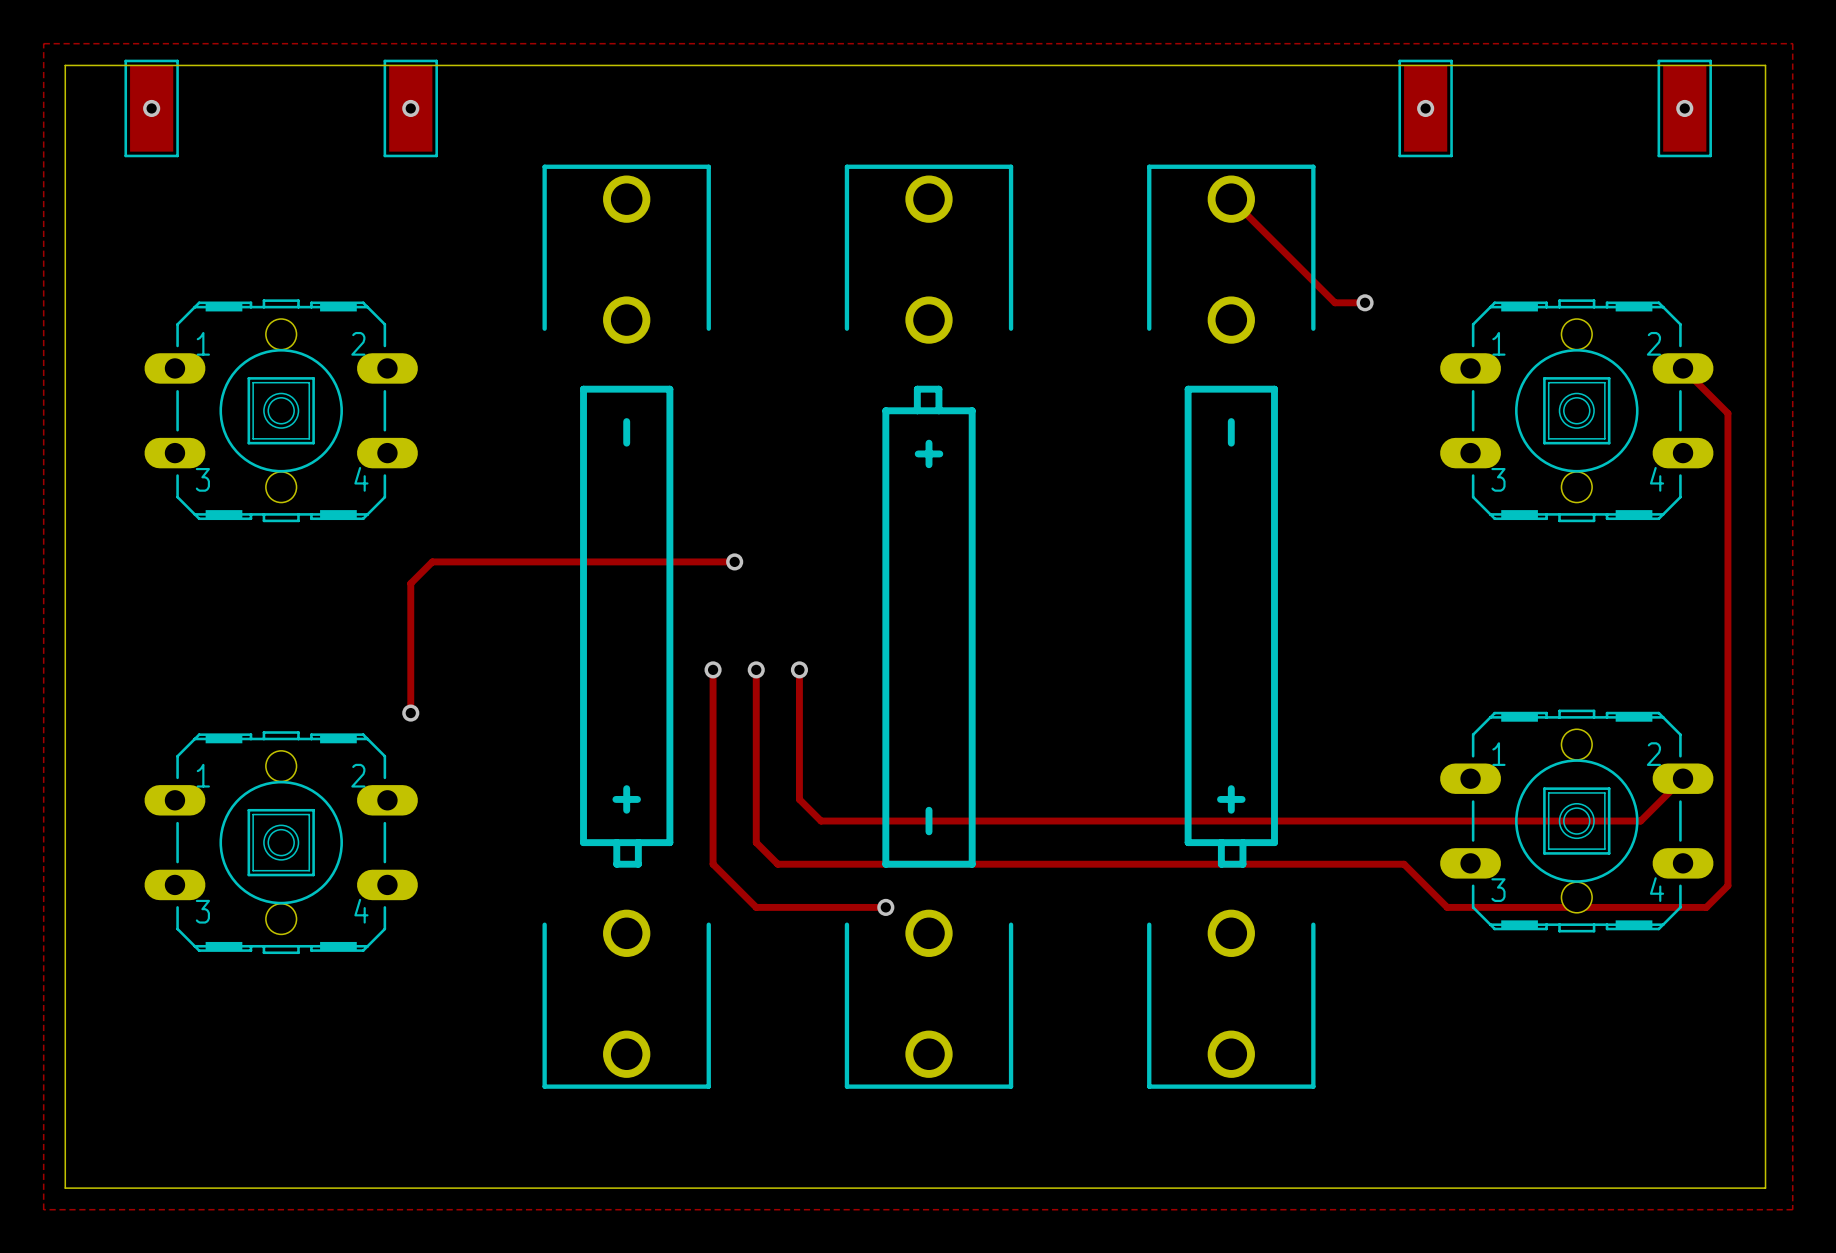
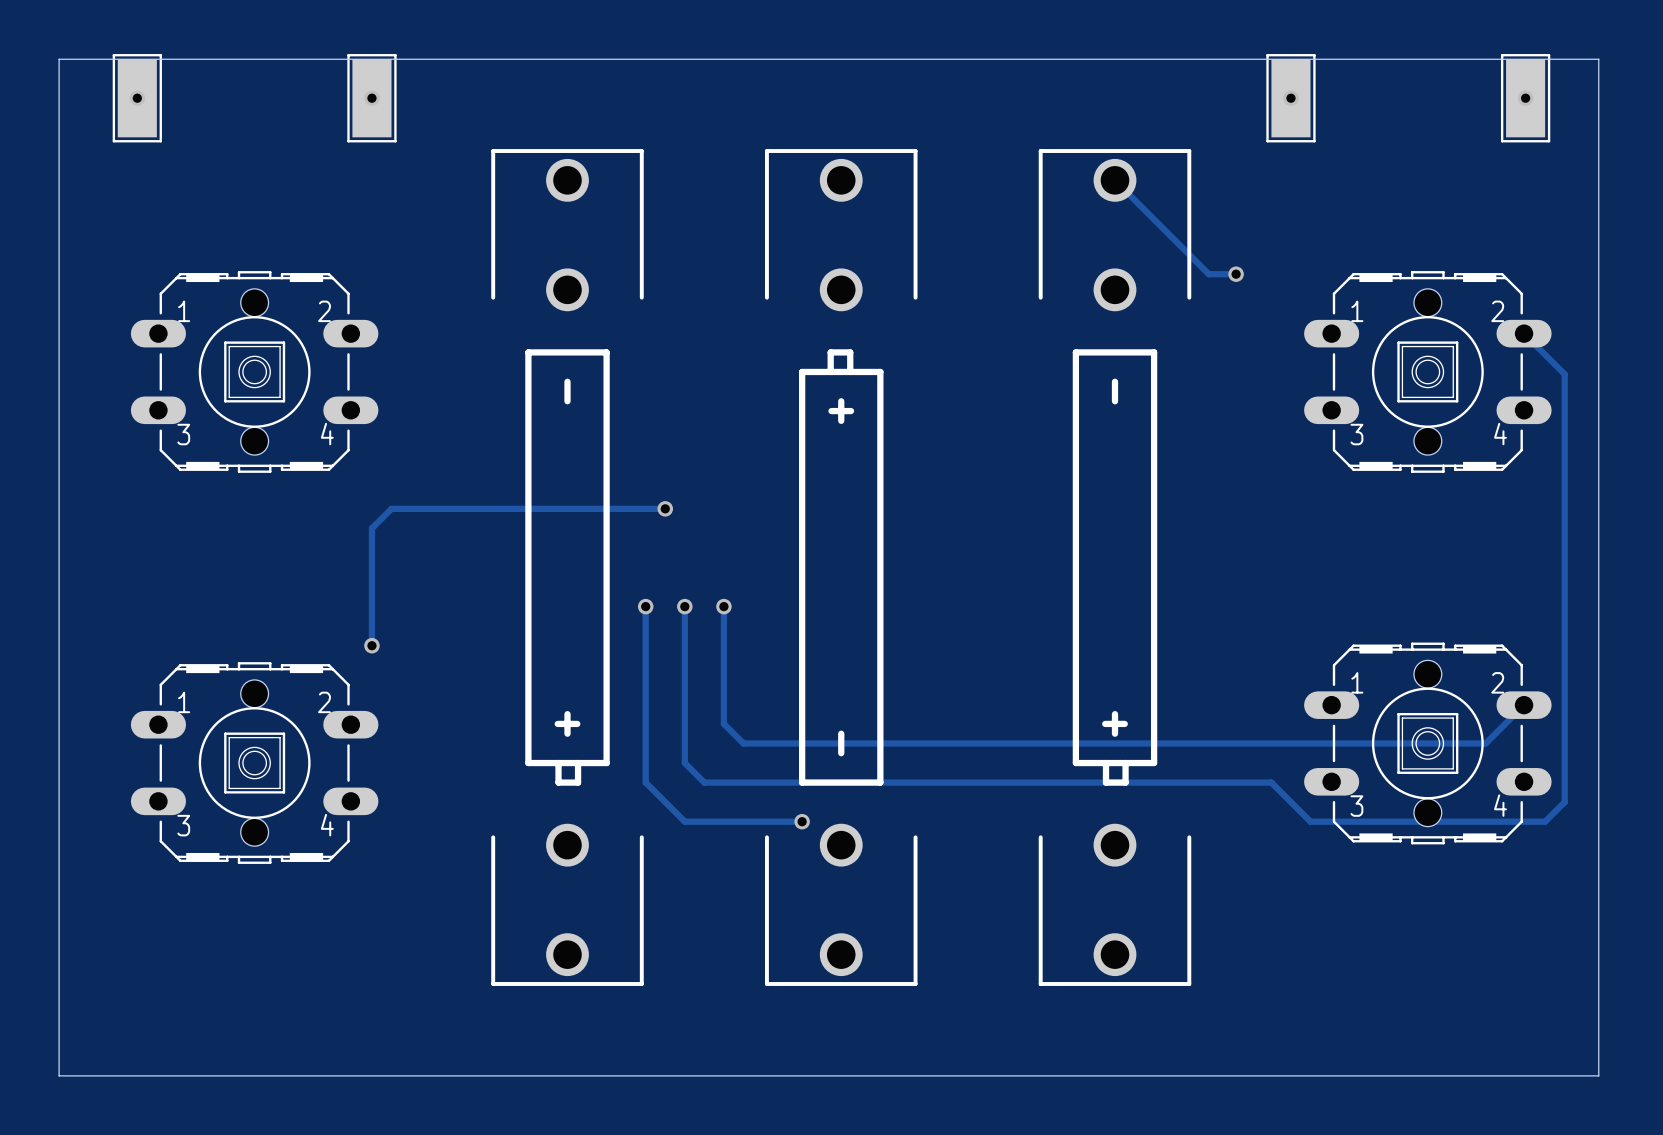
zone outline: (43, 43) (1792, 43) (1792, 1209) (43, 1209) (43, 43) -> none

